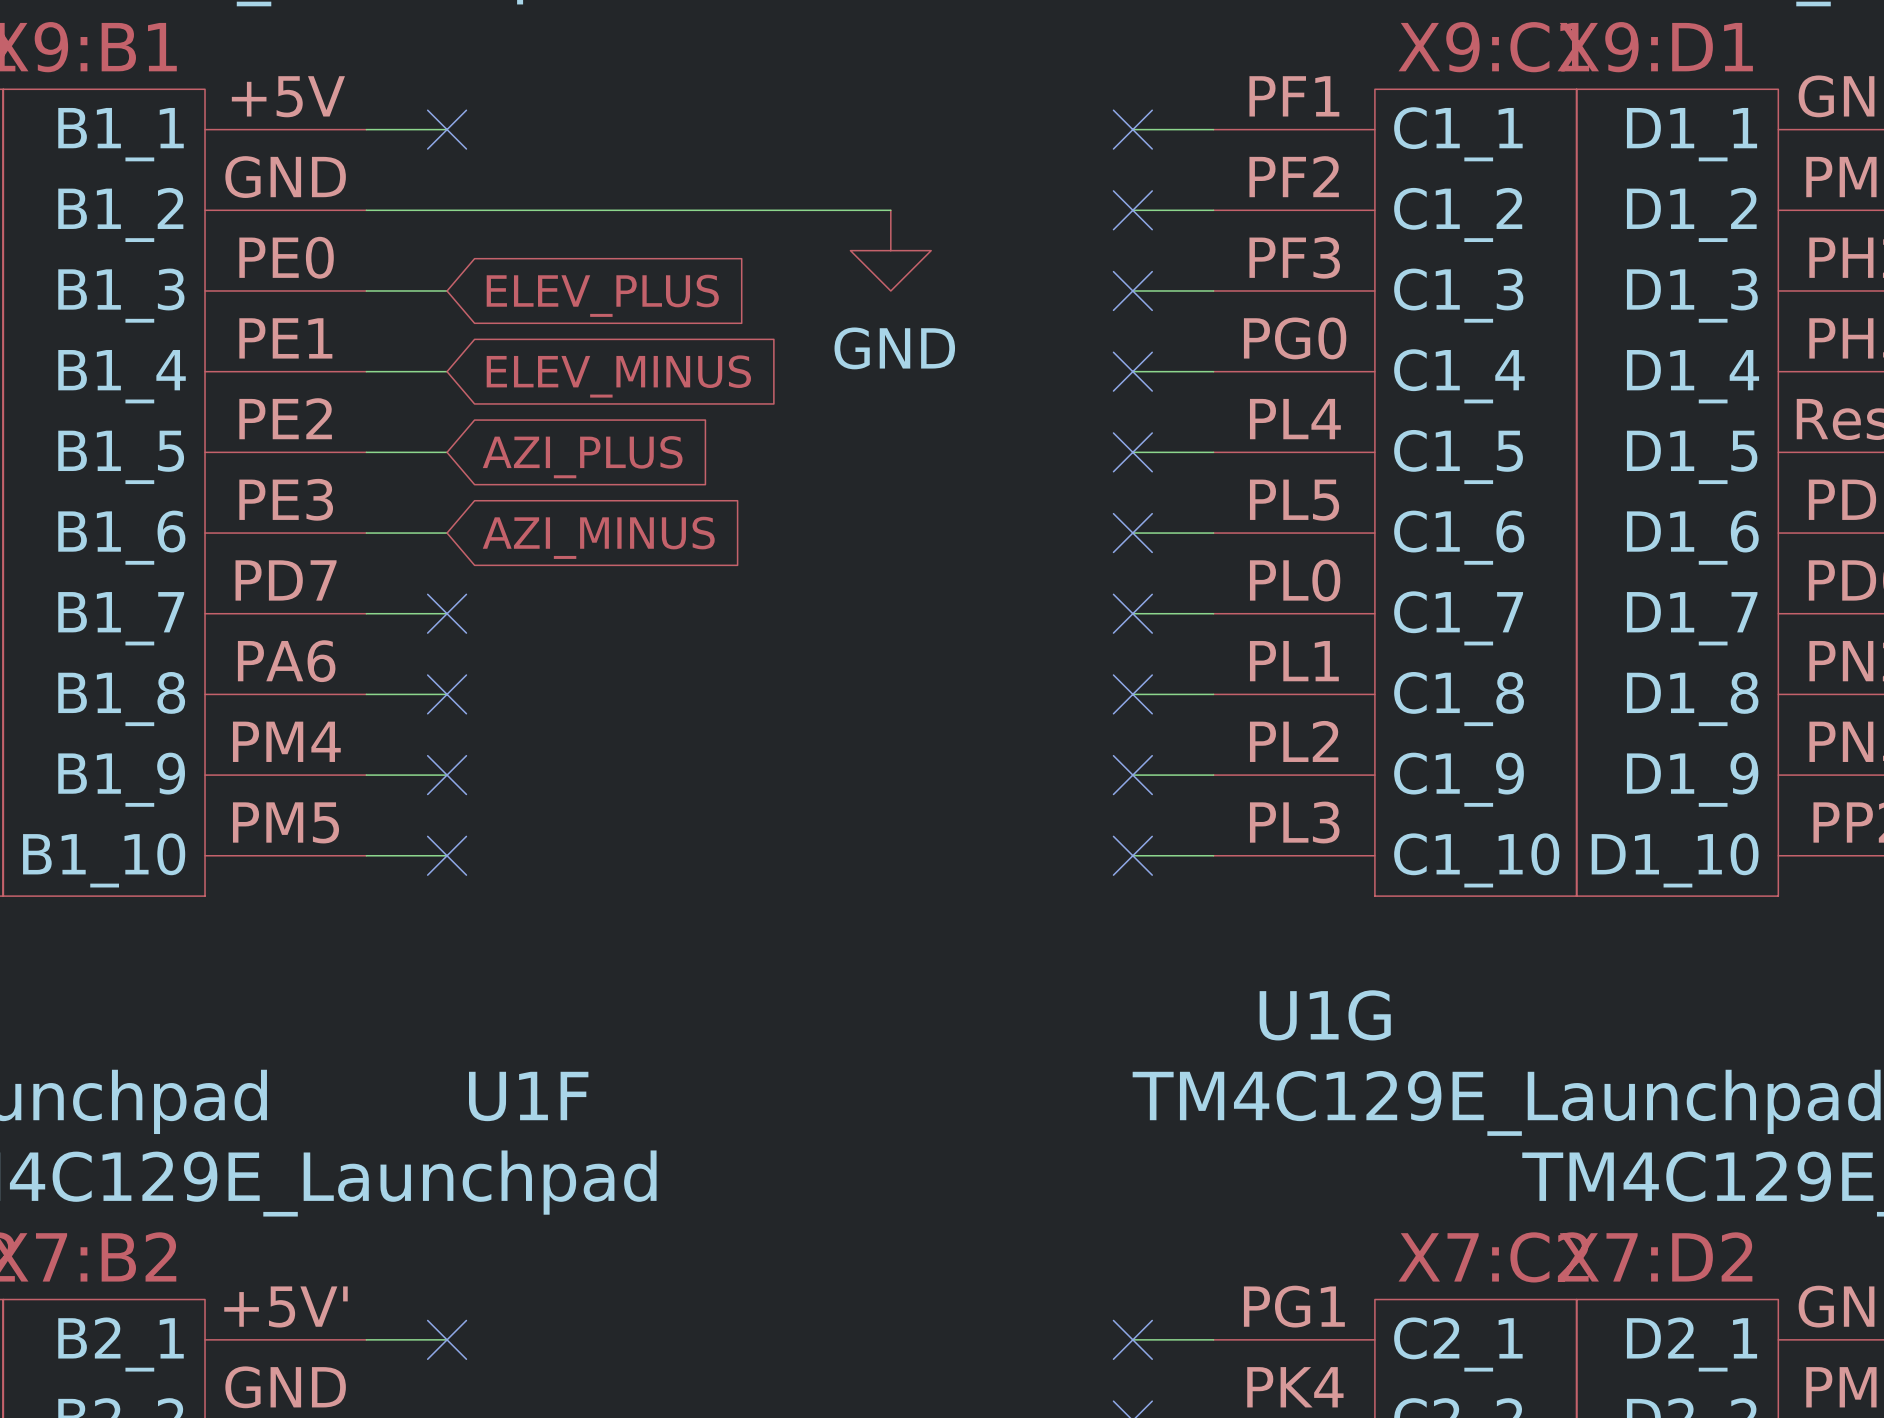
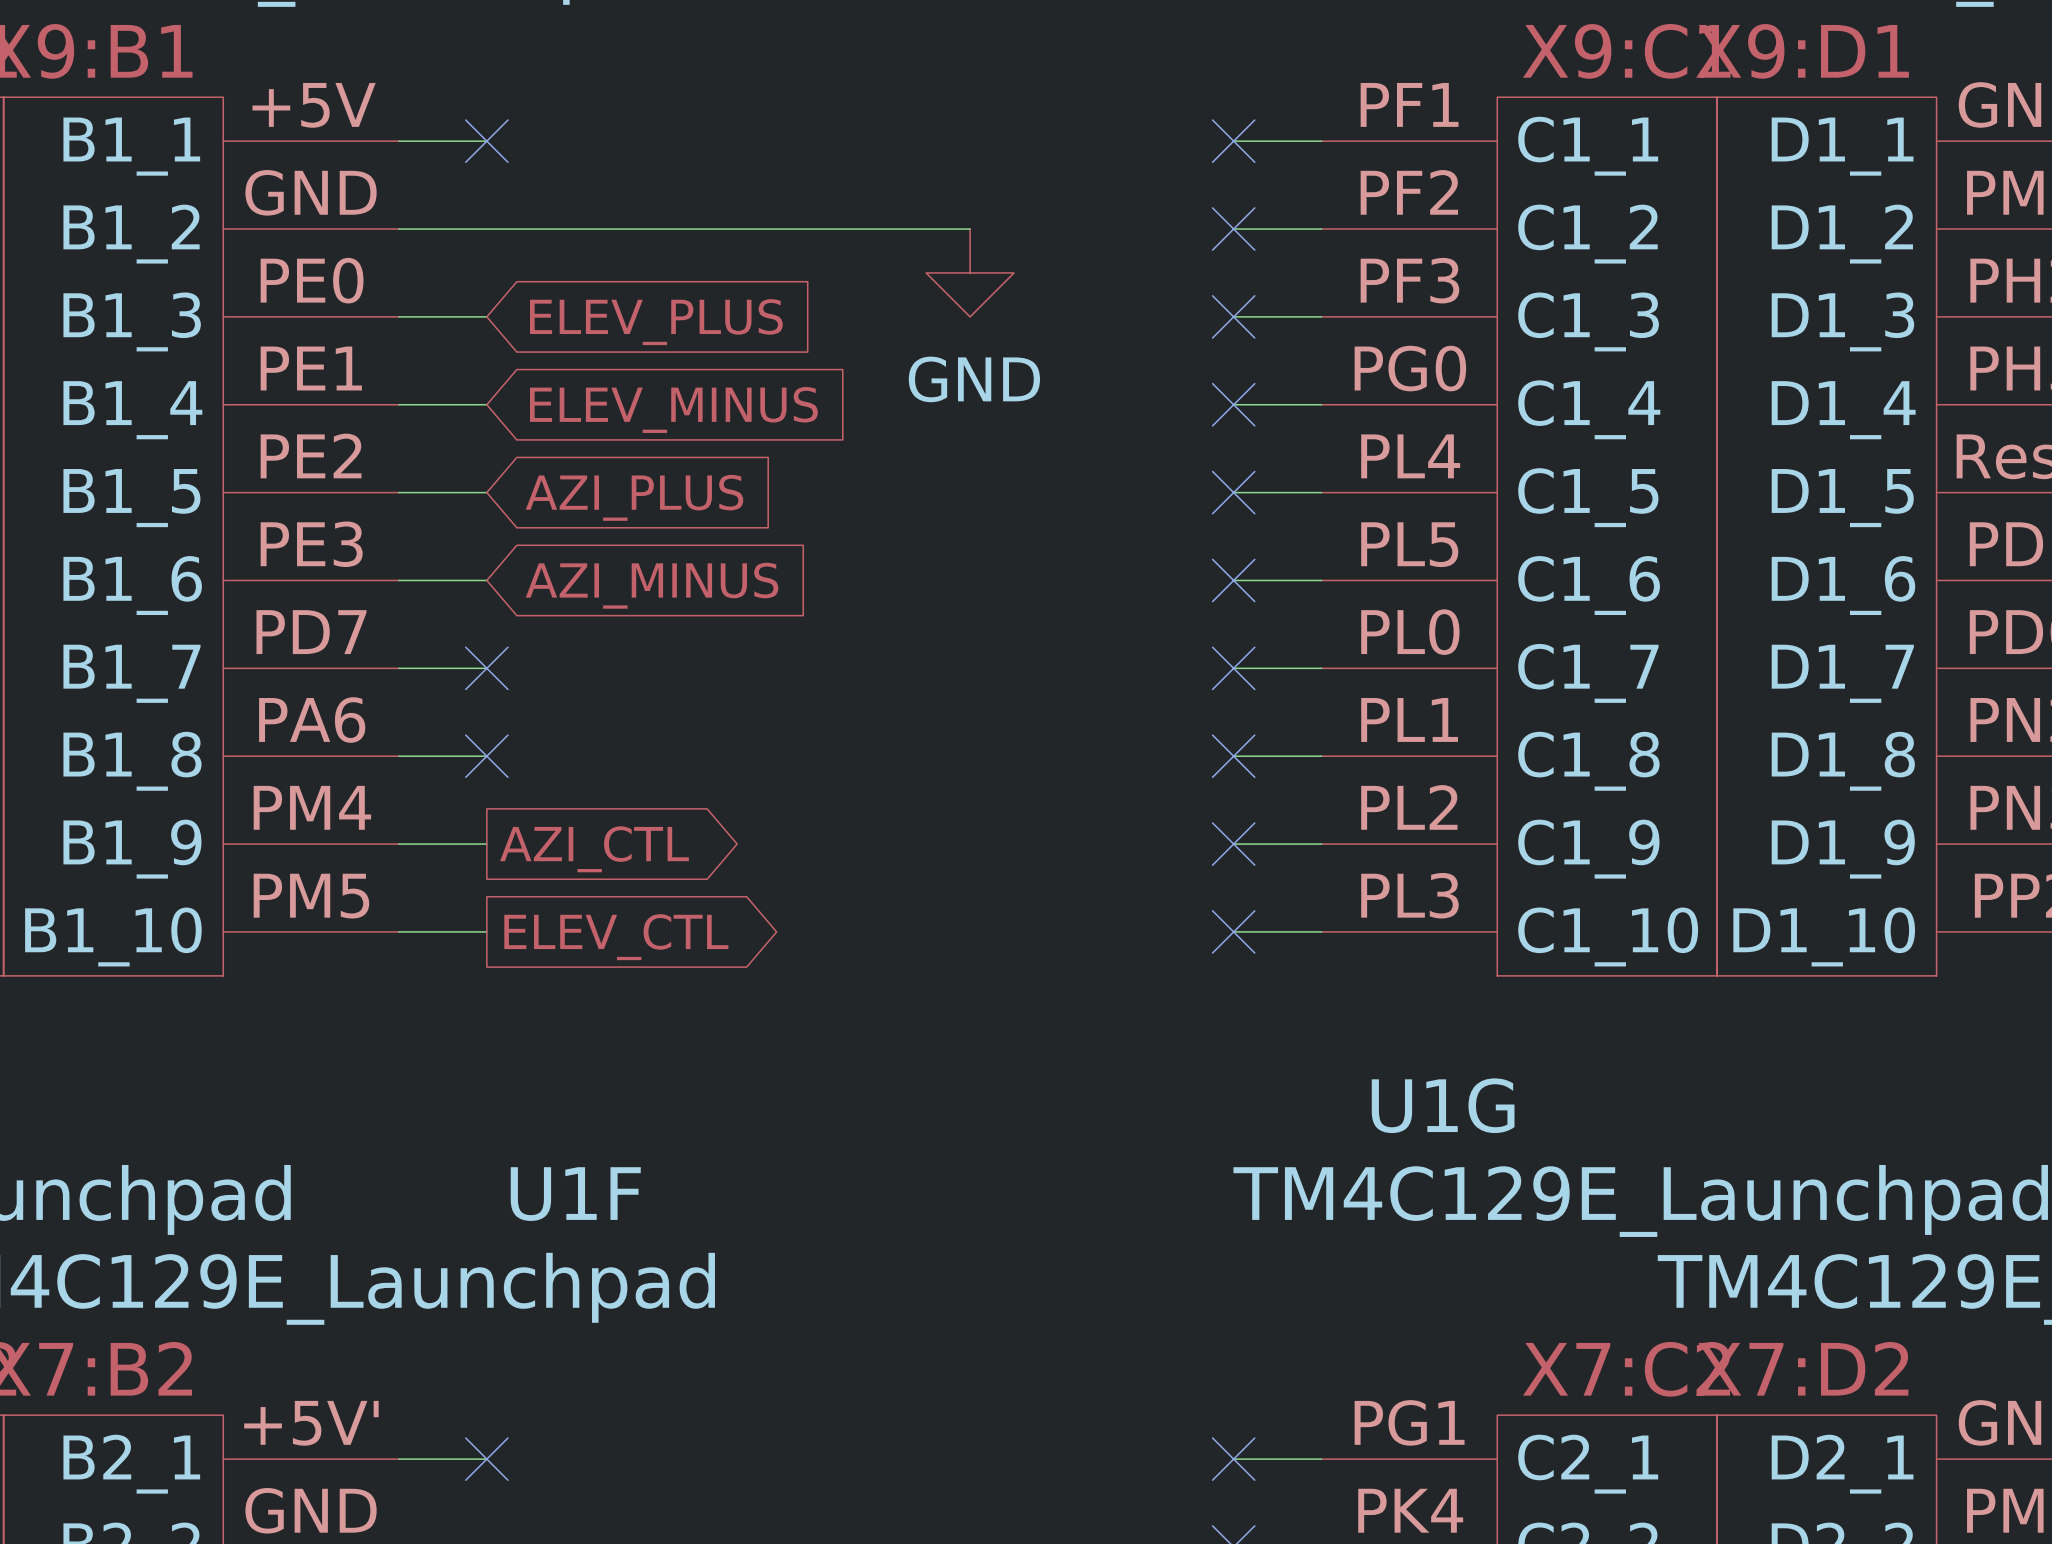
no-connect mark: (447, 775) -> none
global label: none -> AZI_CTL (594, 849)
no-connect mark: (447, 855) -> none
global label: none -> ELEV_CTL (616, 937)

